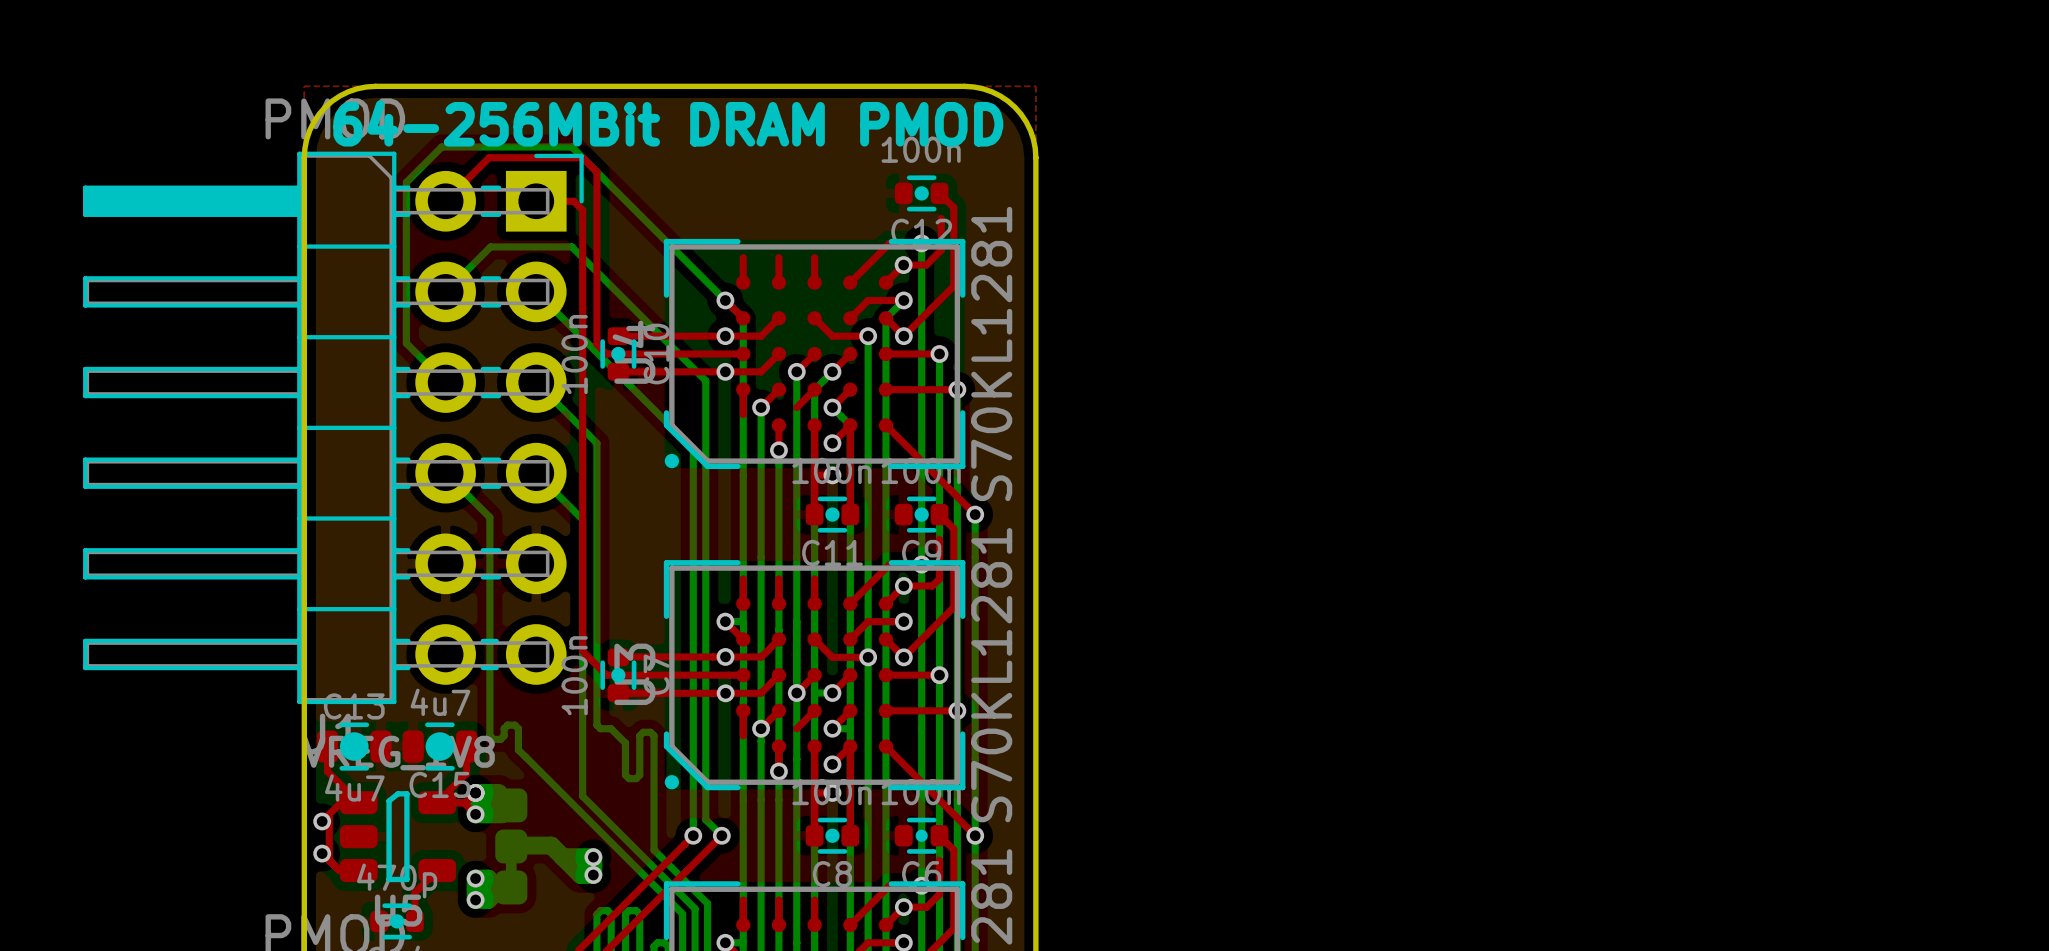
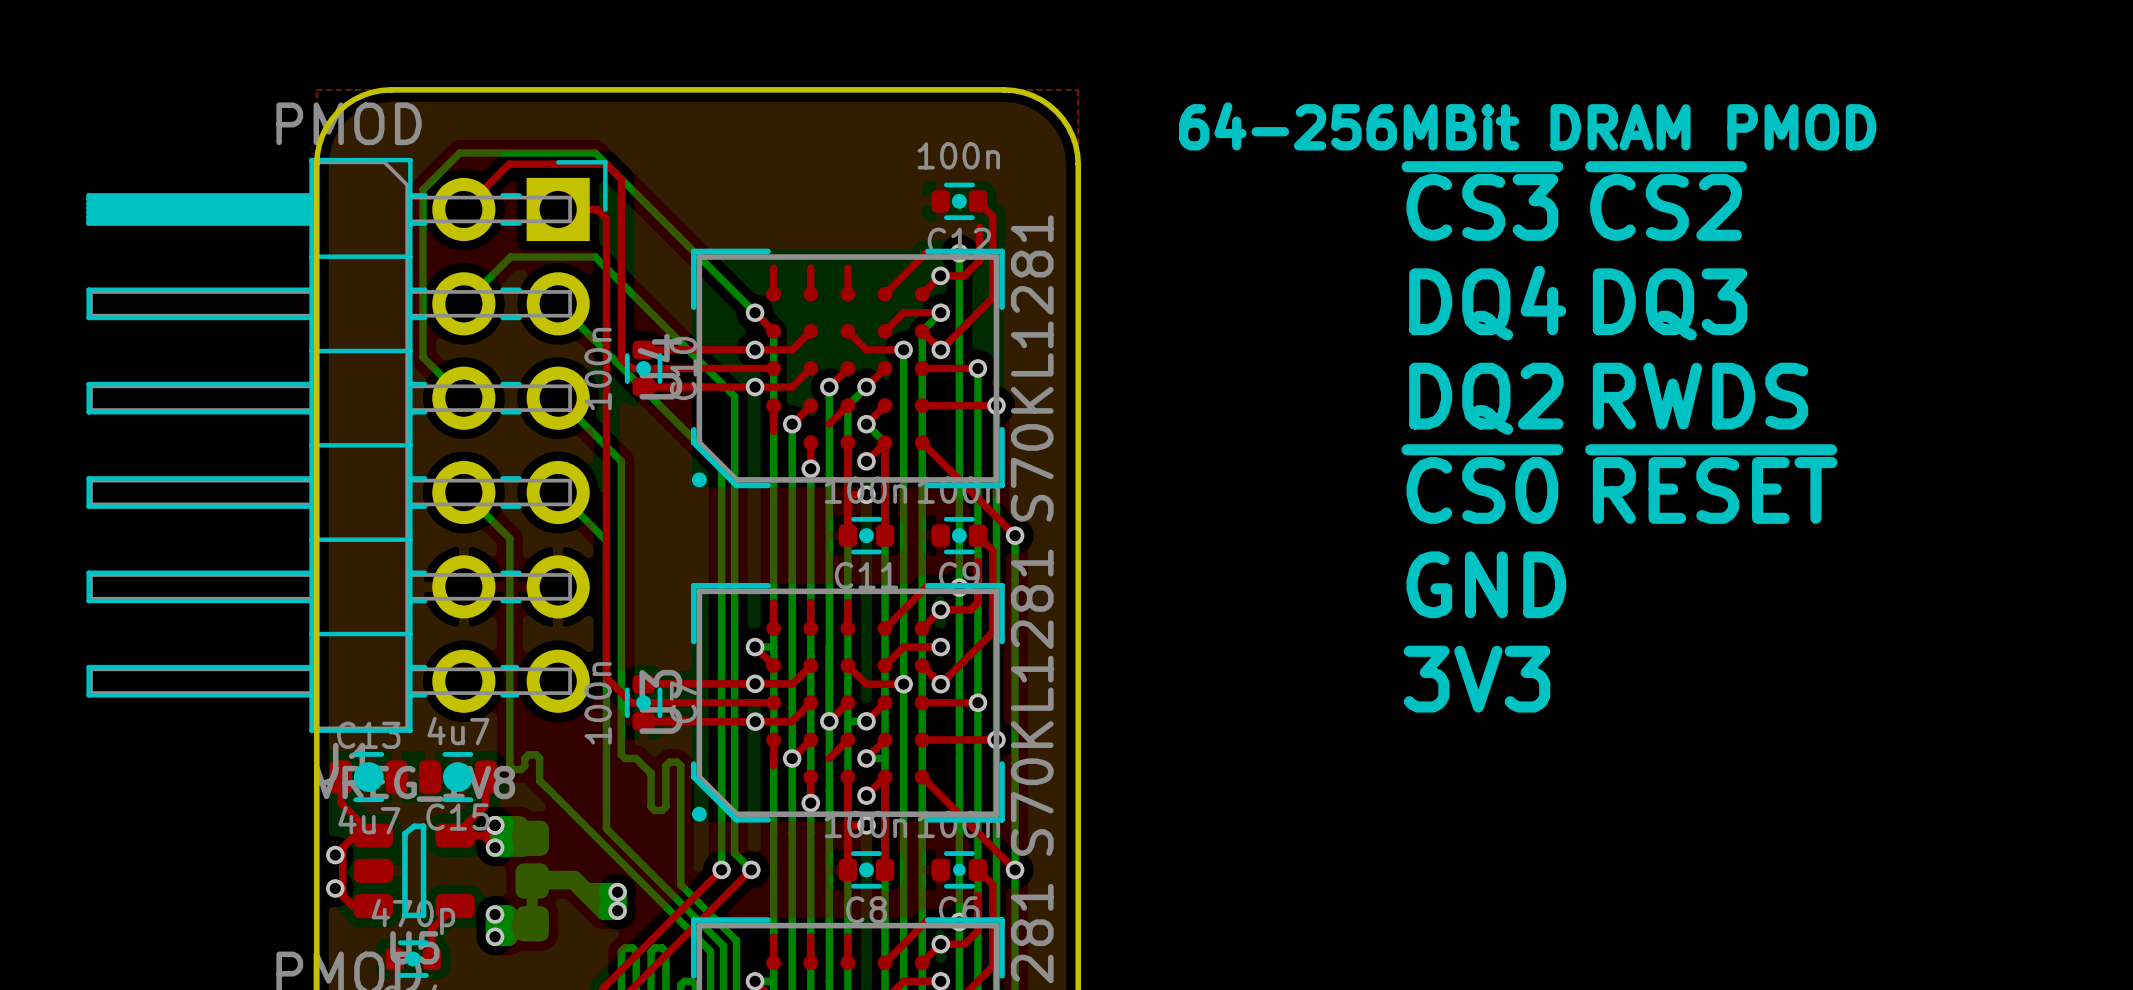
text position: 64-256MBit DRAM PMOD (668, 123) -> 64-256MBit DRAM PMOD (1527, 126)
text: none -> ~{CS3} (1482, 200)
text: none -> ~{CS2} (1666, 200)
text: none -> DQ4 (1487, 303)
text: none -> DQ3 (1670, 304)
text: none -> RWDS (1700, 396)
text: none -> DQ2 (1486, 398)
text: none -> ~{CS0} (1482, 484)
text: none -> ~{RESET} (1711, 484)
text: none -> GND (1486, 584)
text: none -> 3V3 (1477, 679)

